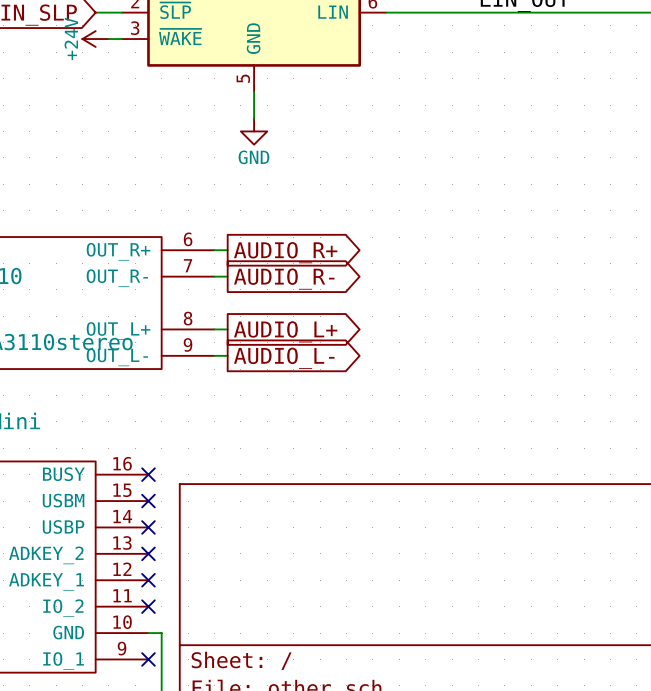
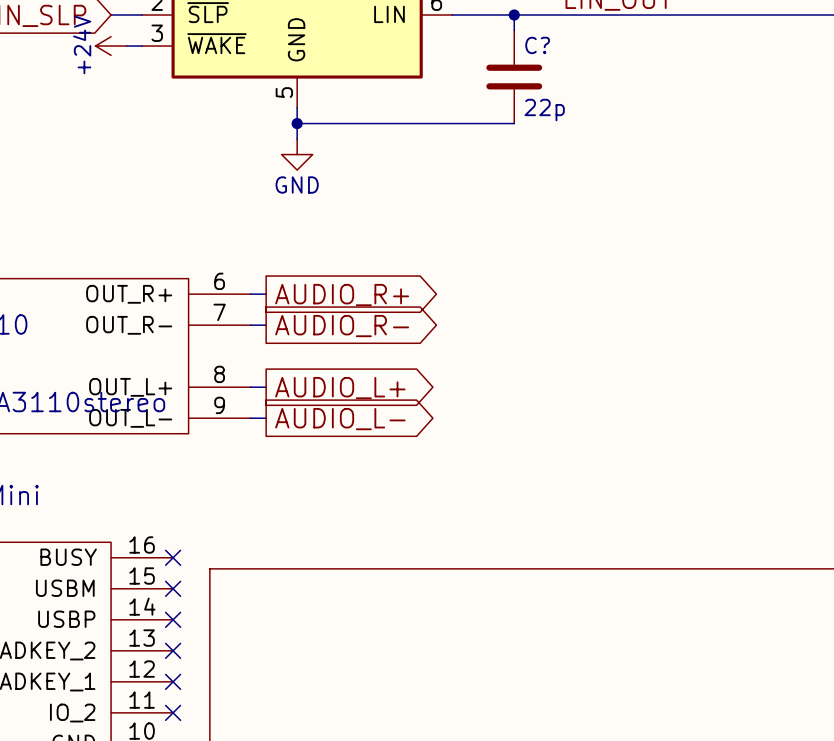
wire: none -> (514, 15) (514, 30)
junction: none -> (514, 15)
C?: none -> 22p (514, 77)
wire: none -> (297, 123) (514, 123)
junction: none -> (297, 123)

